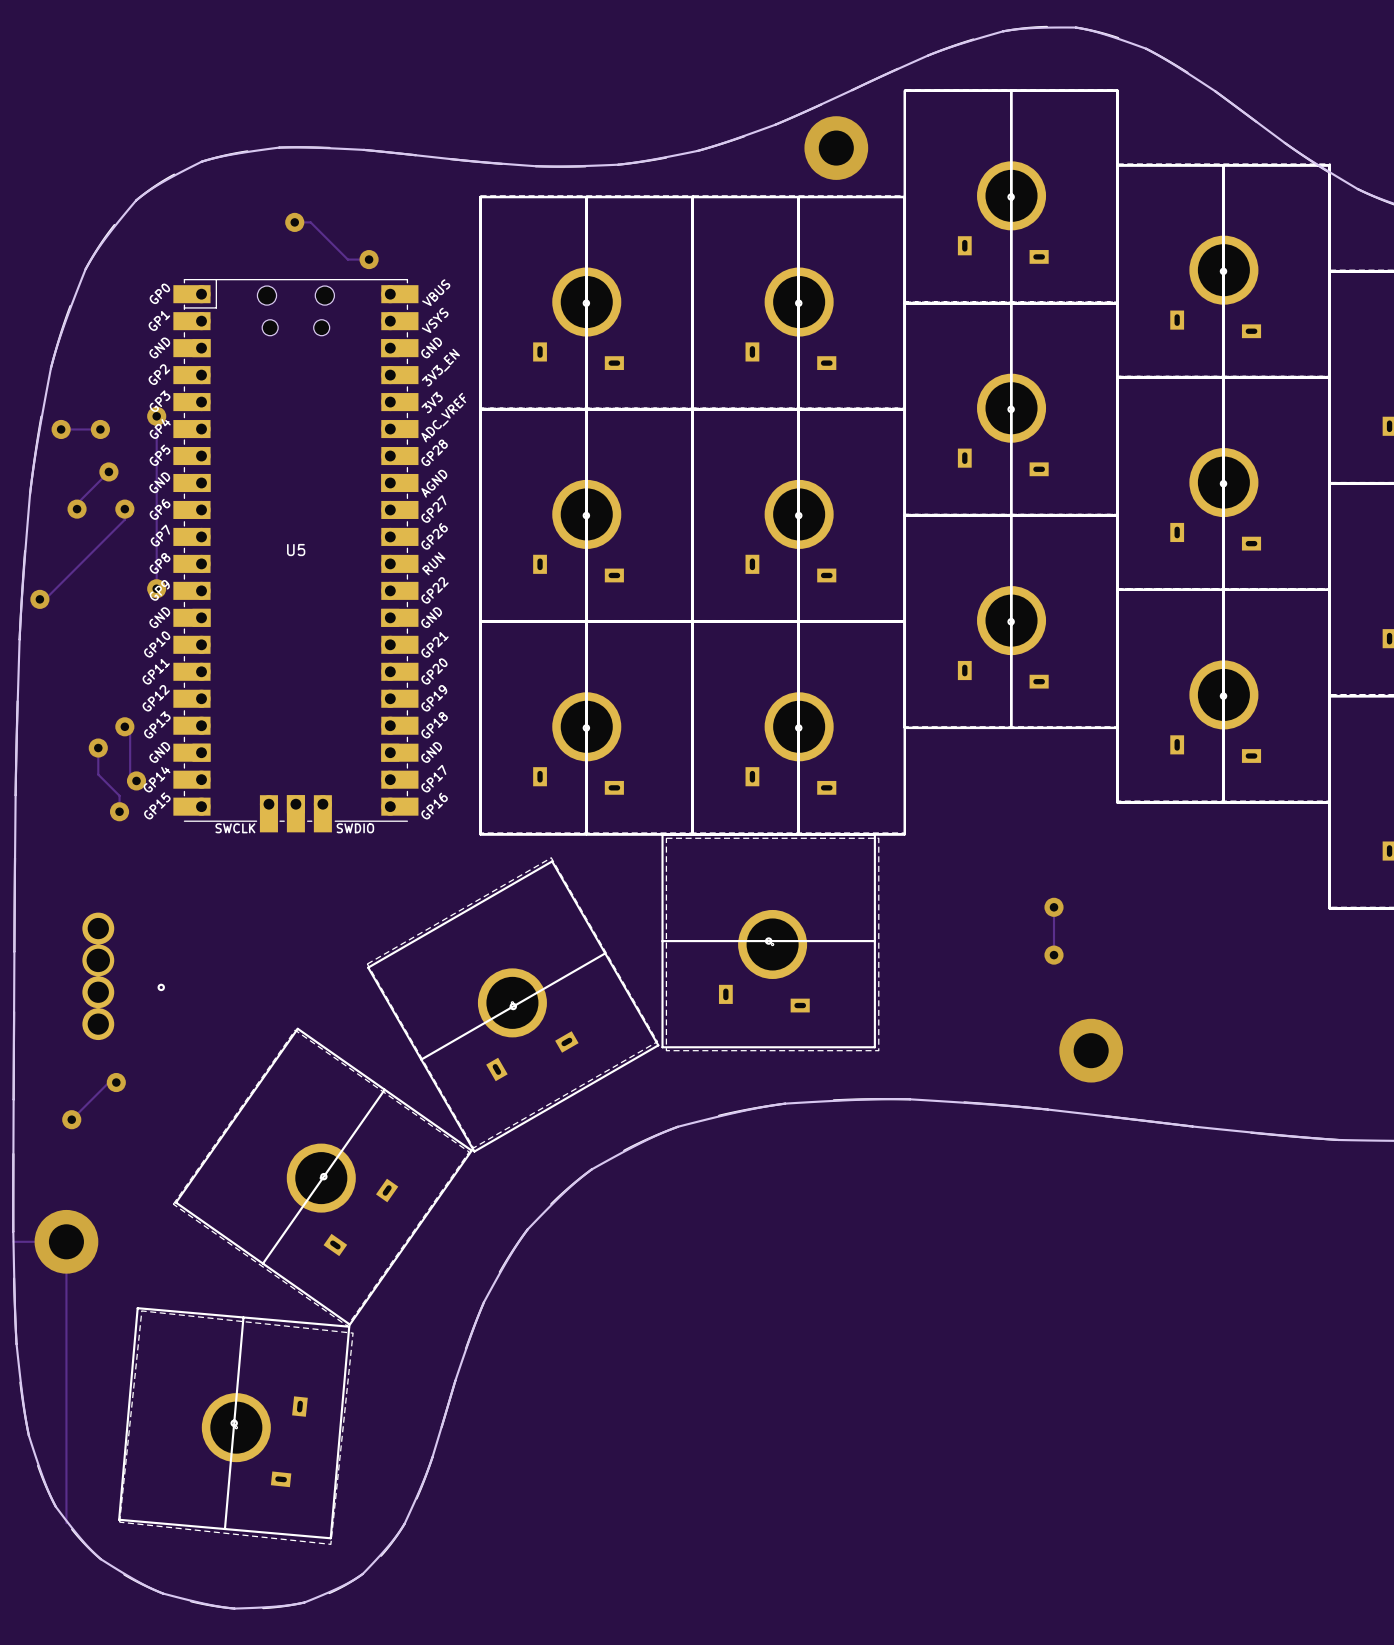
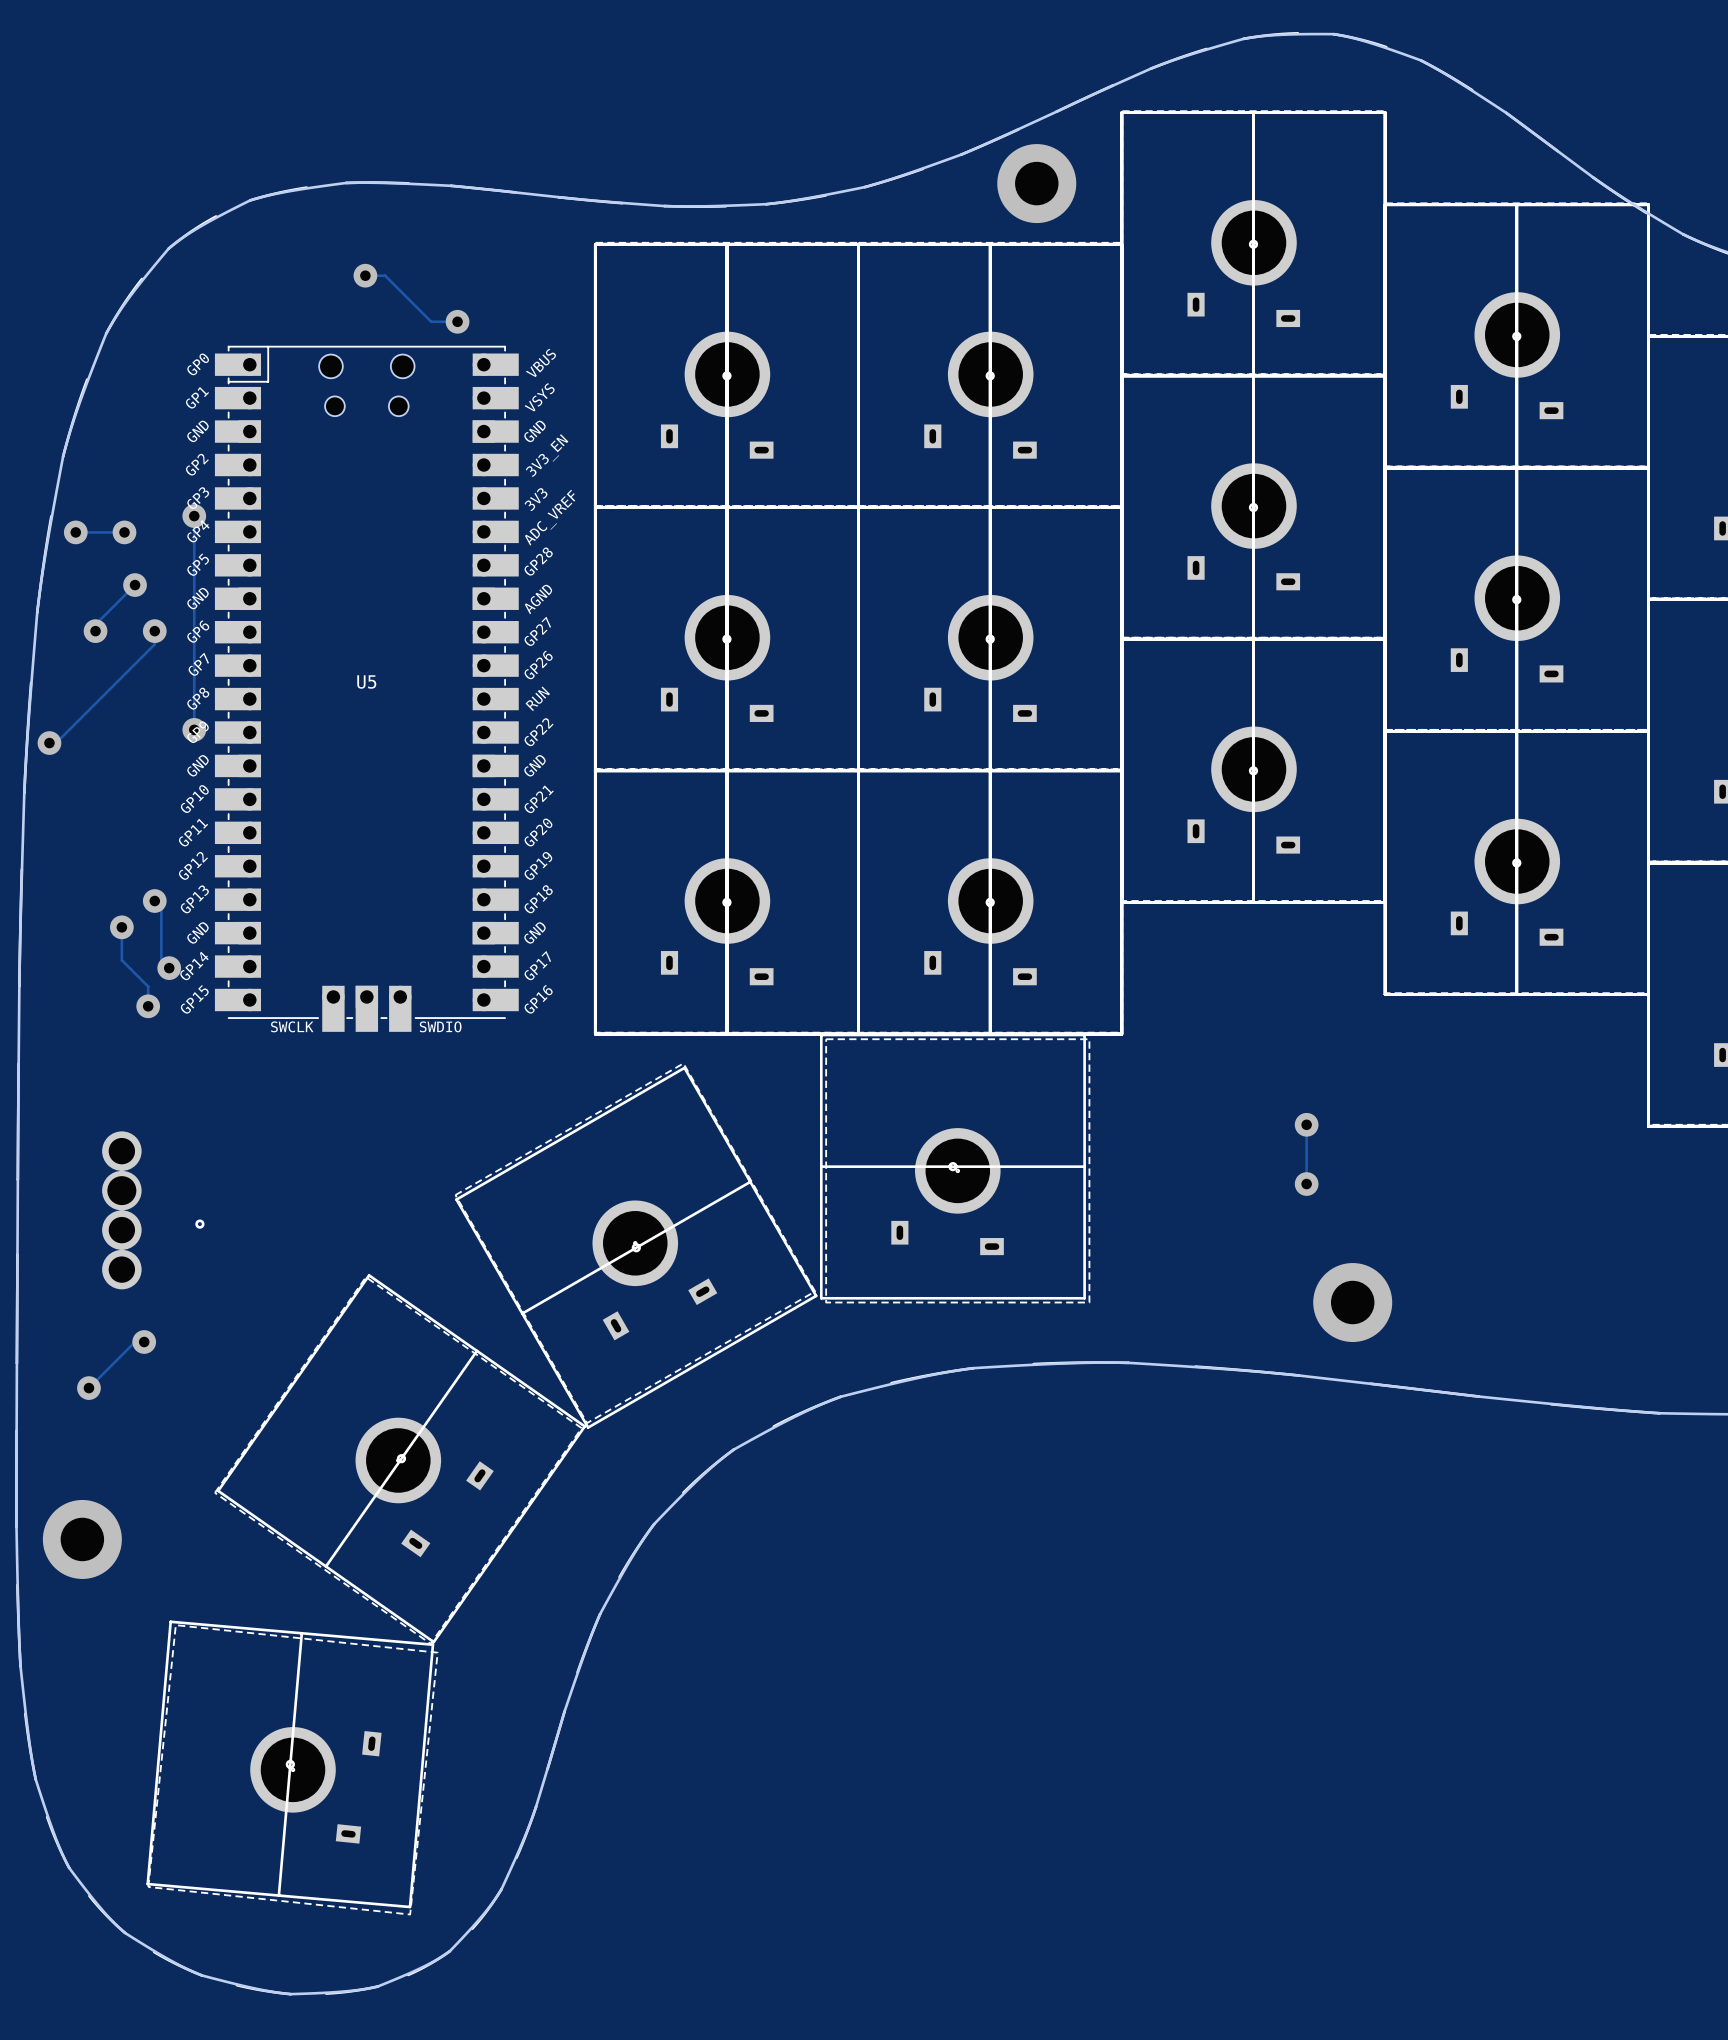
track: (13, 1241) (66, 1241) (66, 1523) -> none

